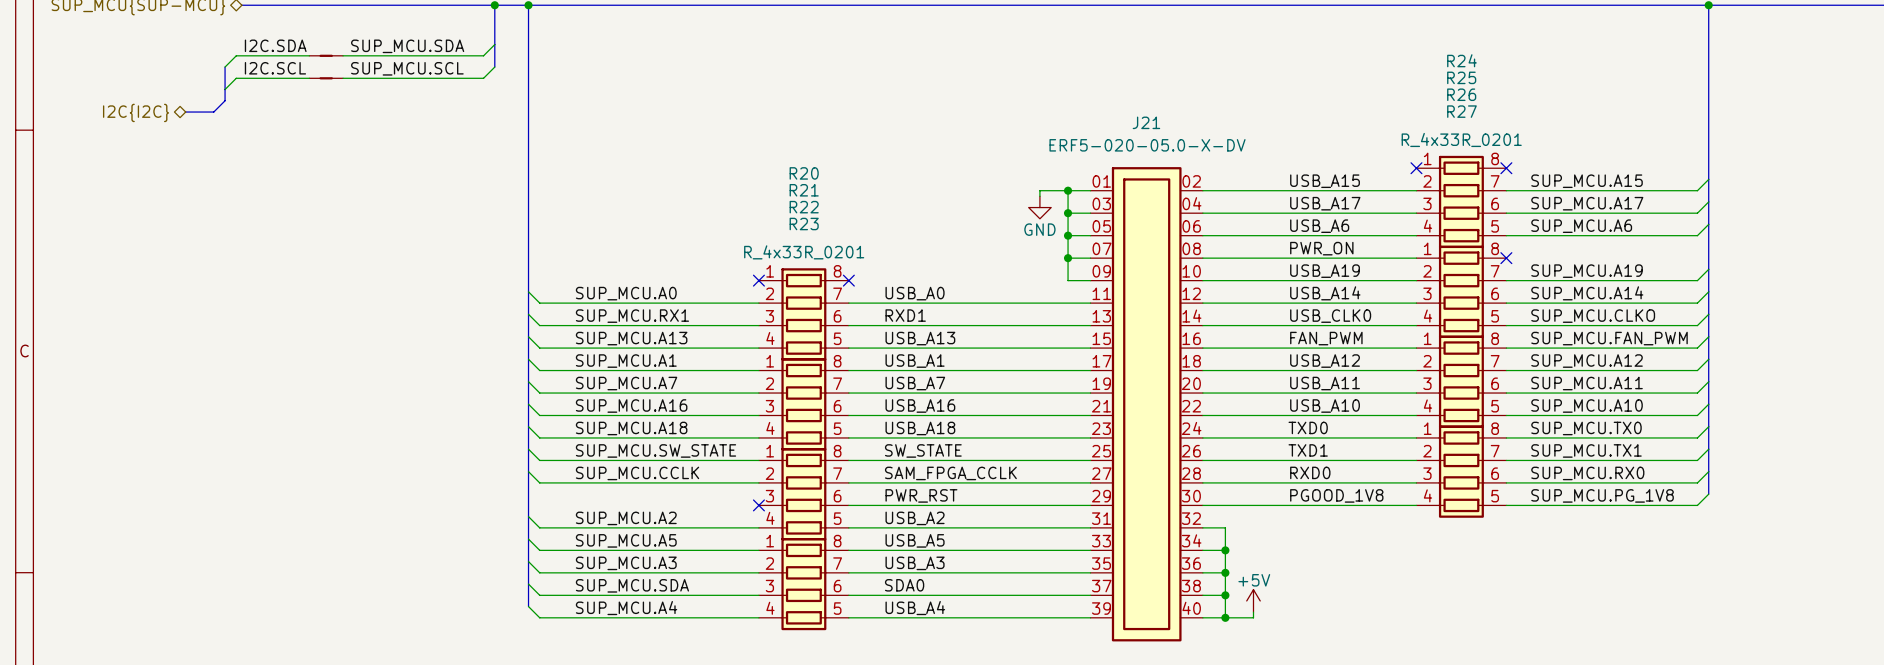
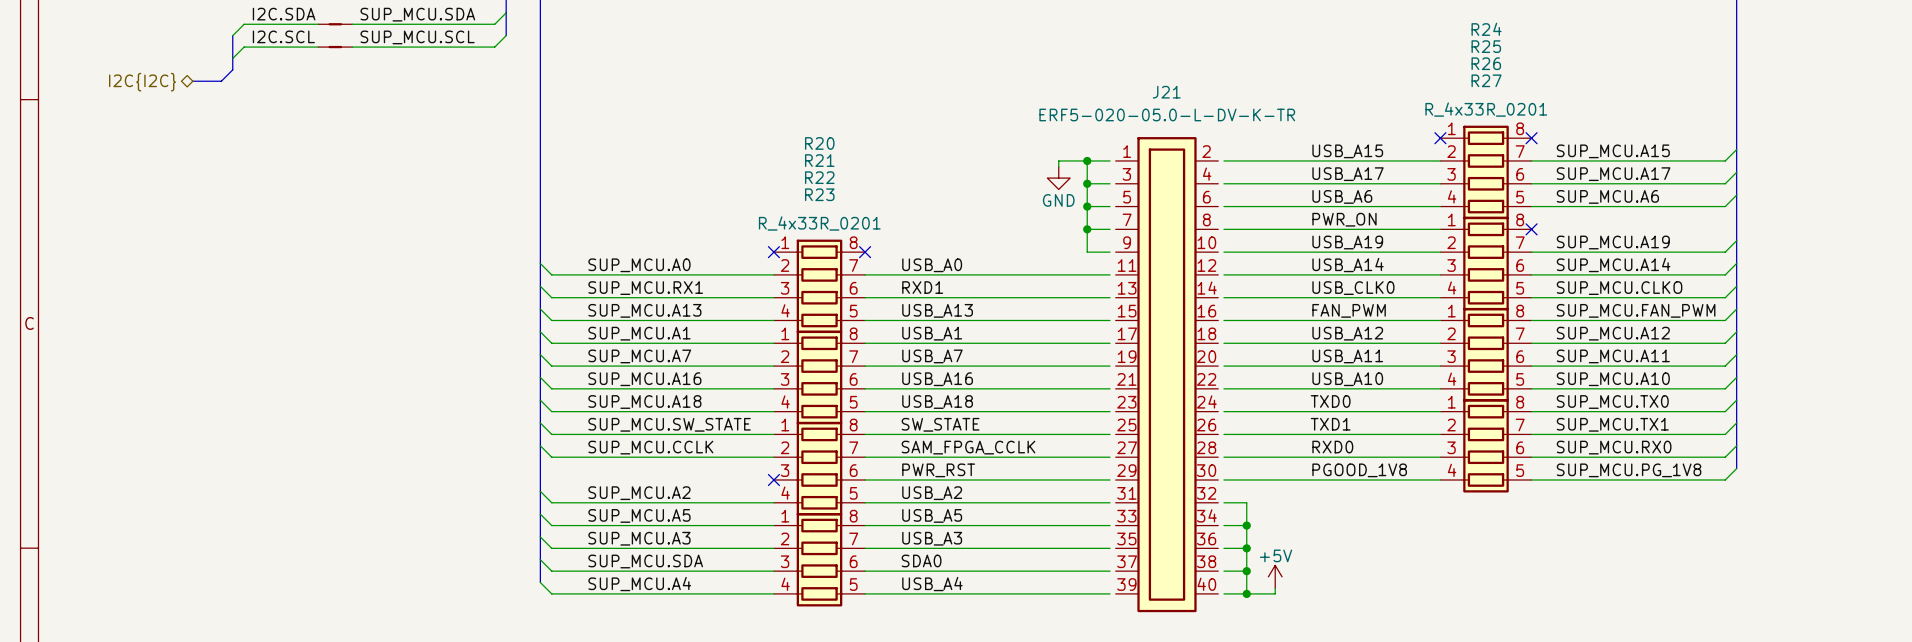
J21 text: none -> ERF5-020-05.0-L-DV-K-TR (1167, 114)
J21 value: ERF5-020-05.0-X-DV (1147, 145) -> none
J21 symbol: [1090, 167, 1203, 642] -> [1115, 137, 1219, 613]

